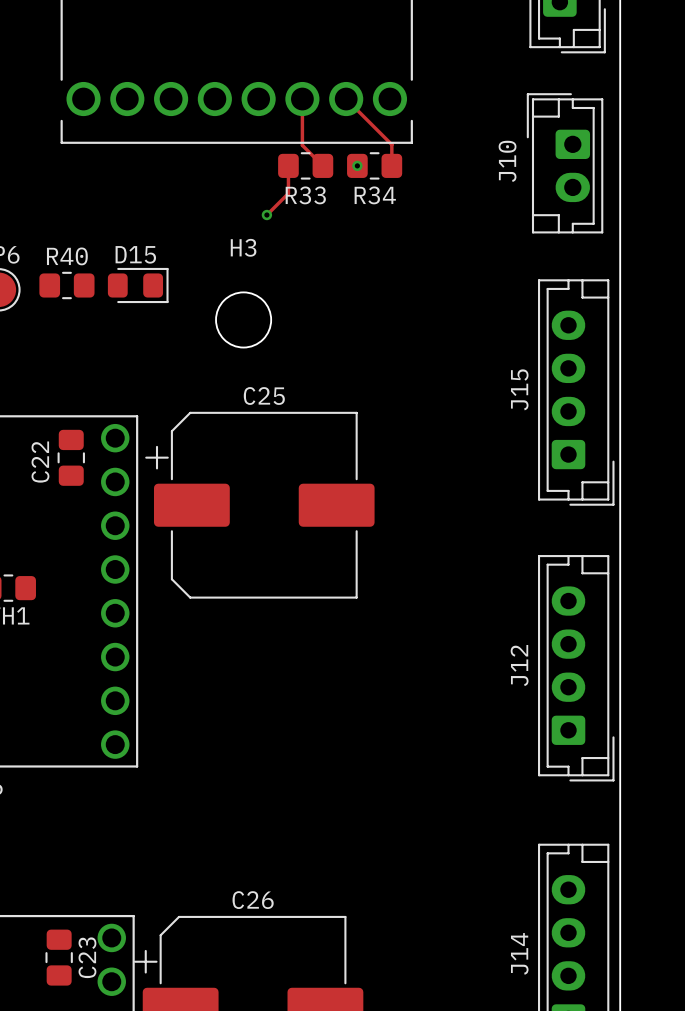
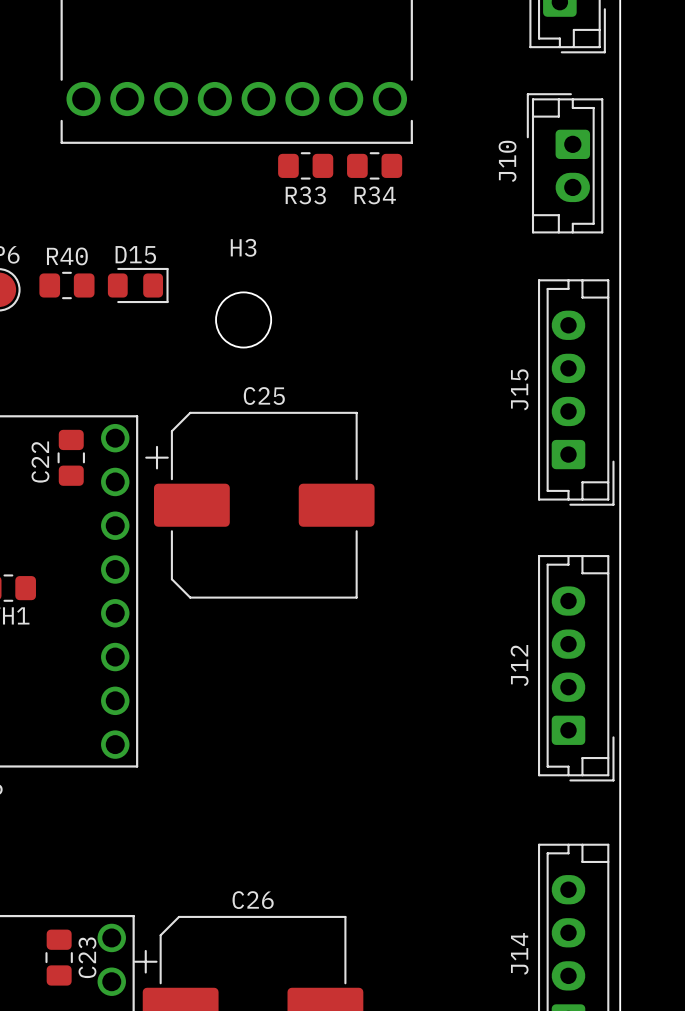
track: (302, 99) (302, 145) (322, 165) -> none
track: (346, 99) (391, 144) (391, 165) -> none
track: (288, 165) (288, 193) (266, 215) -> none
via: (357, 165) -> none
via: (266, 215) -> none

